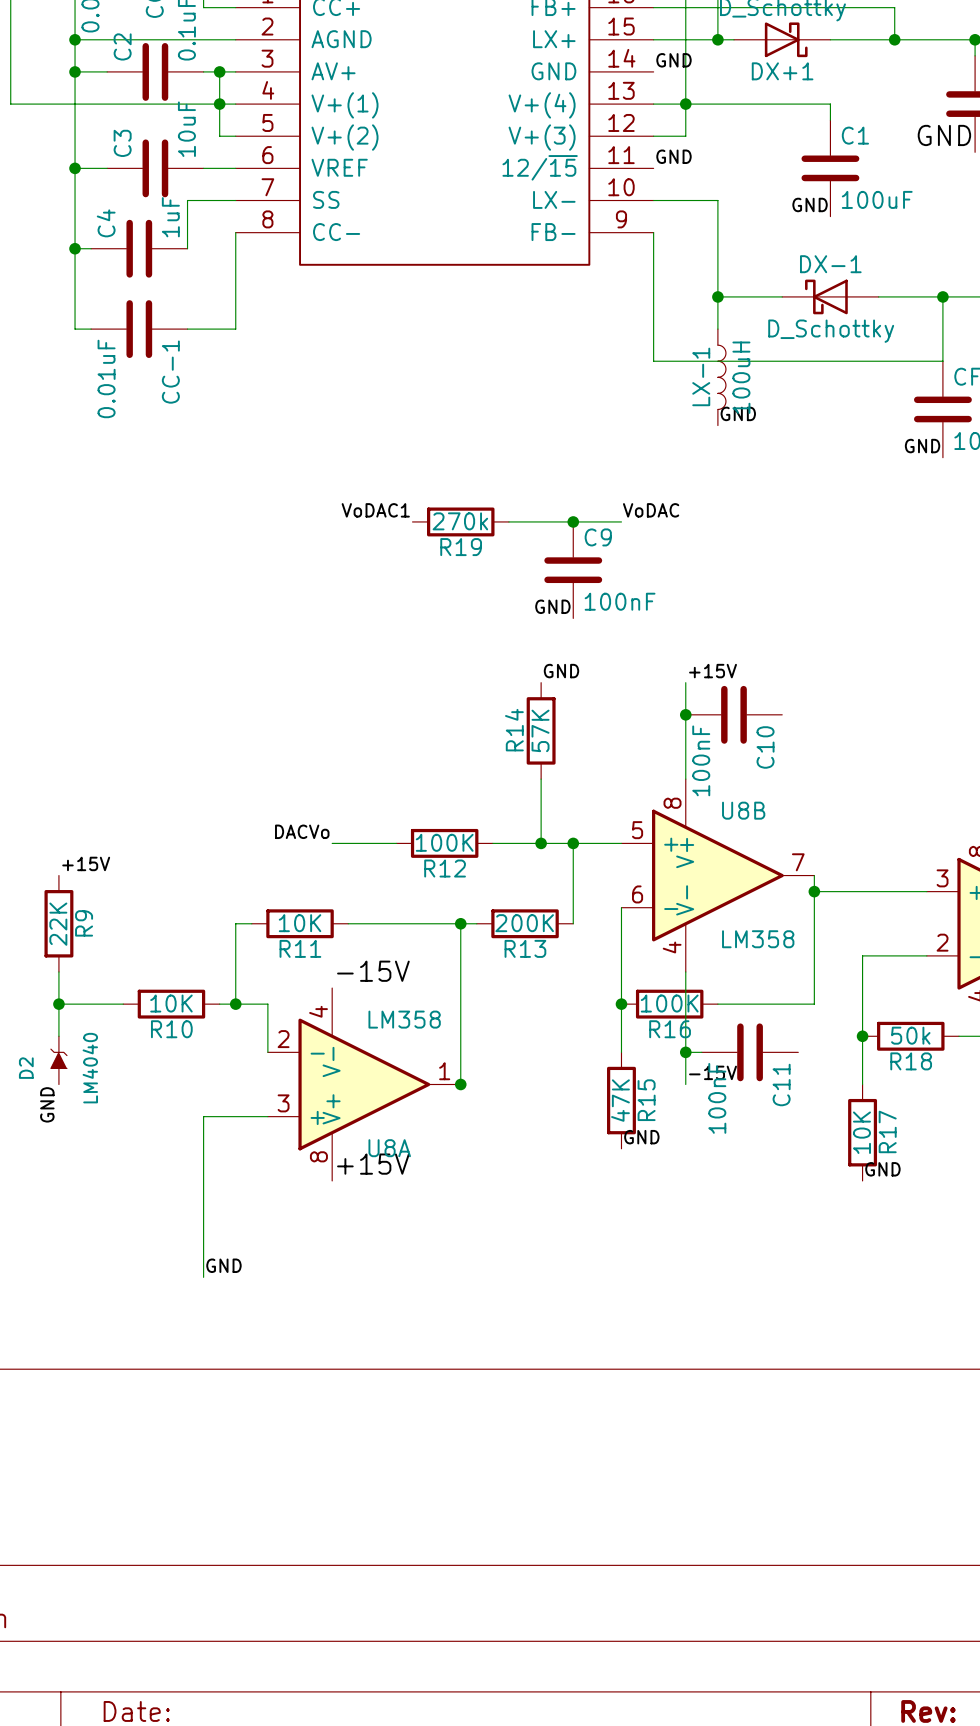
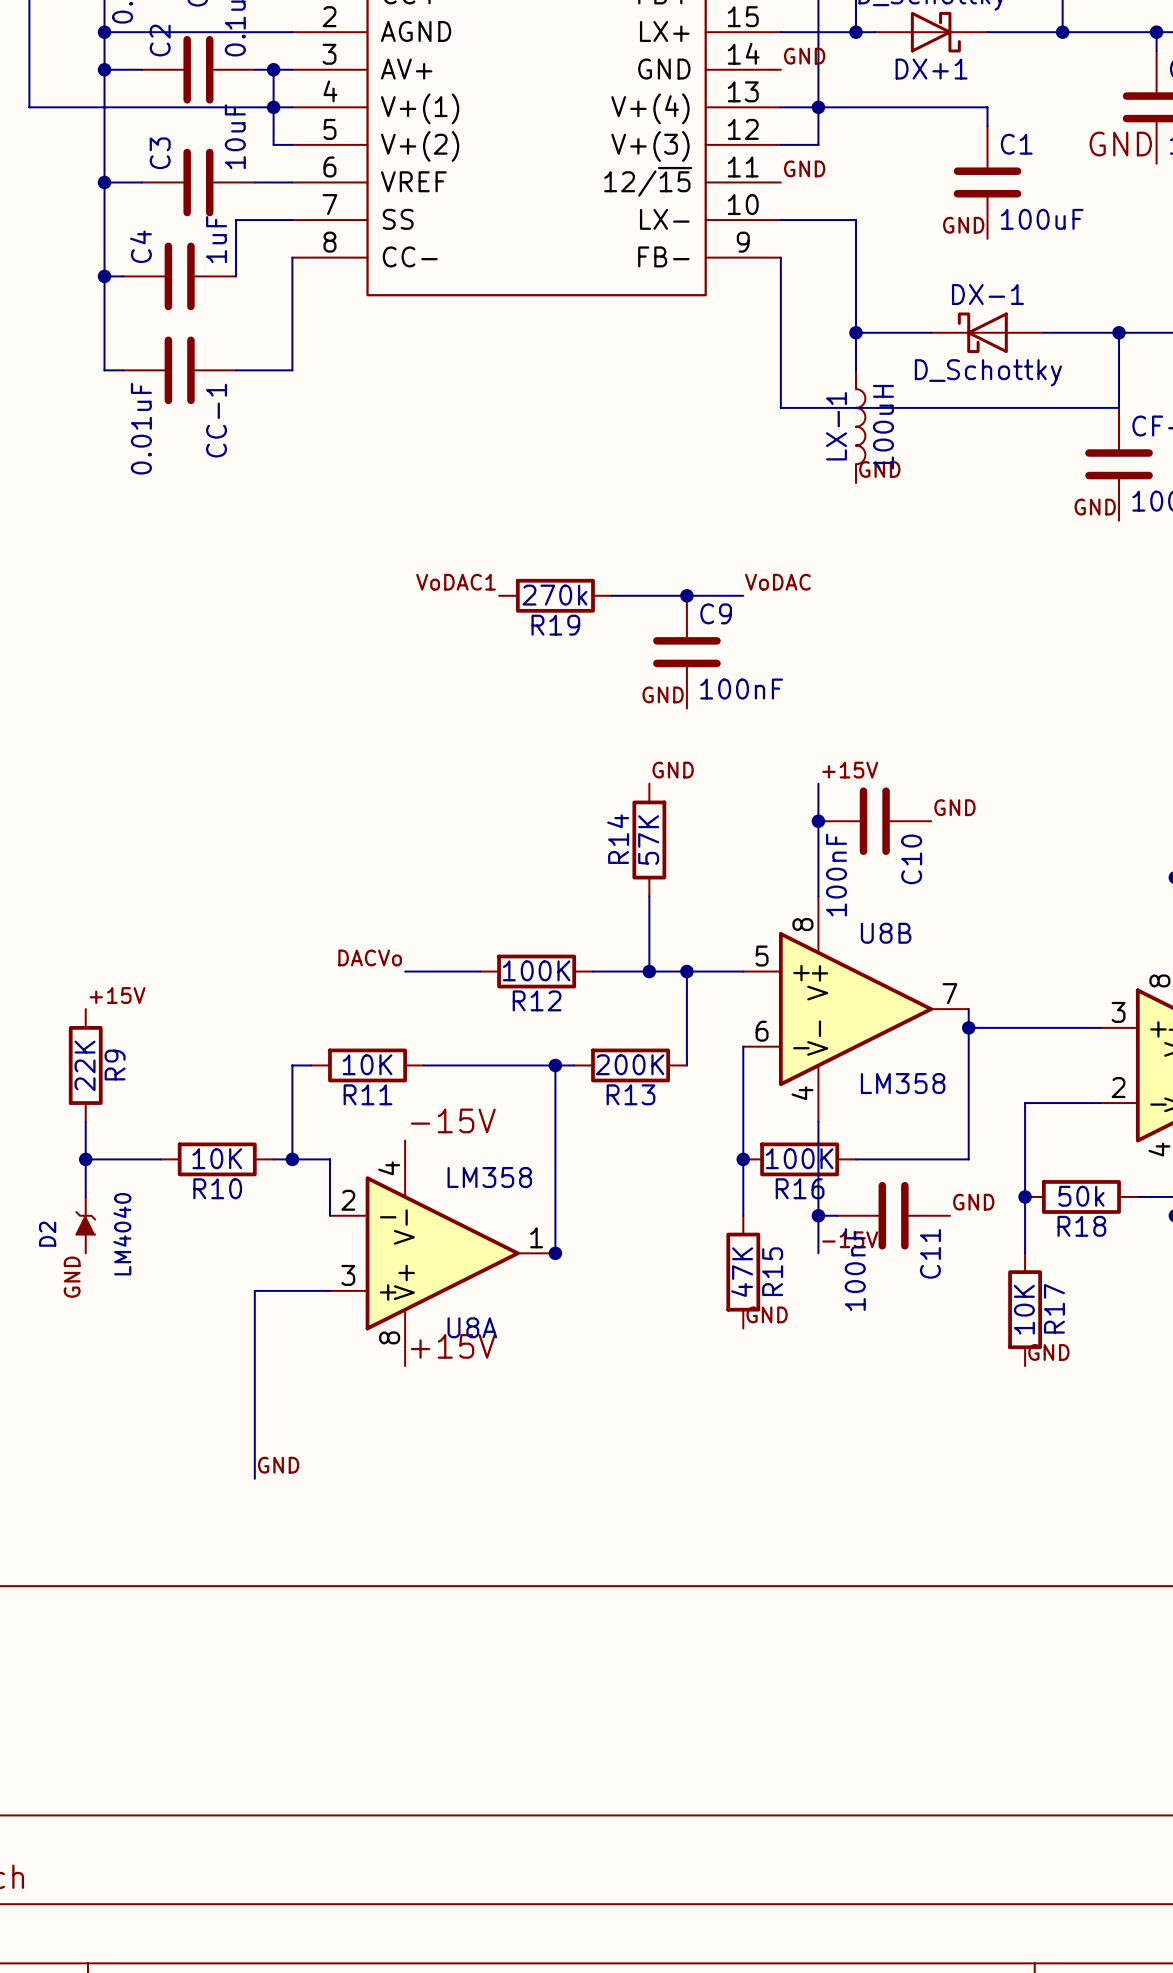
label: none -> GND (954, 807)
label: none -> GND (973, 1202)

